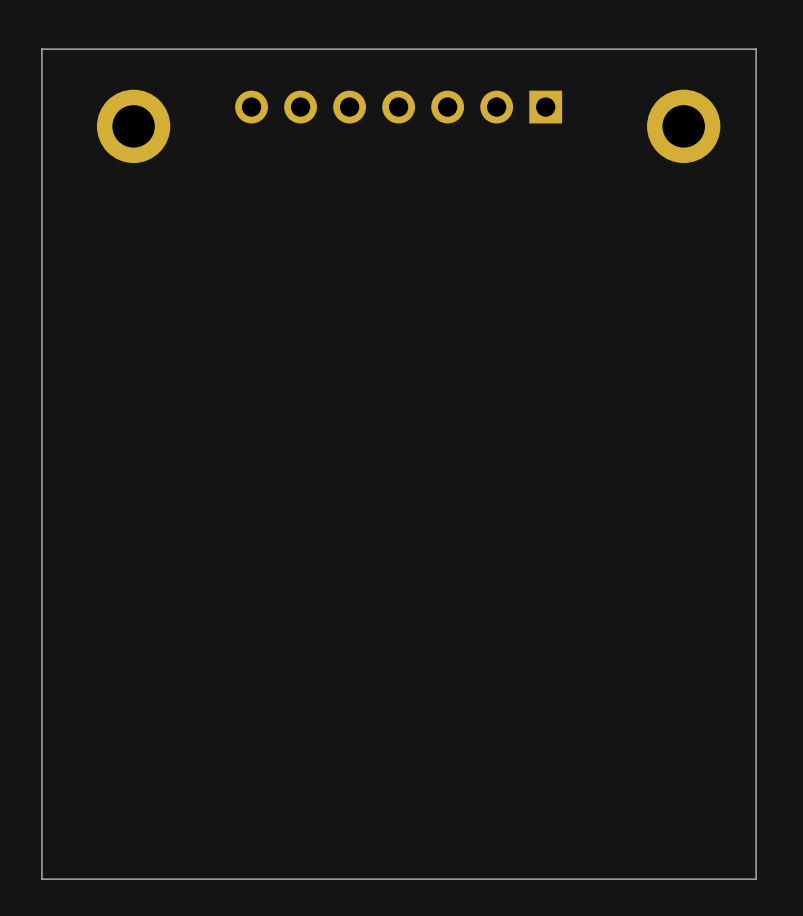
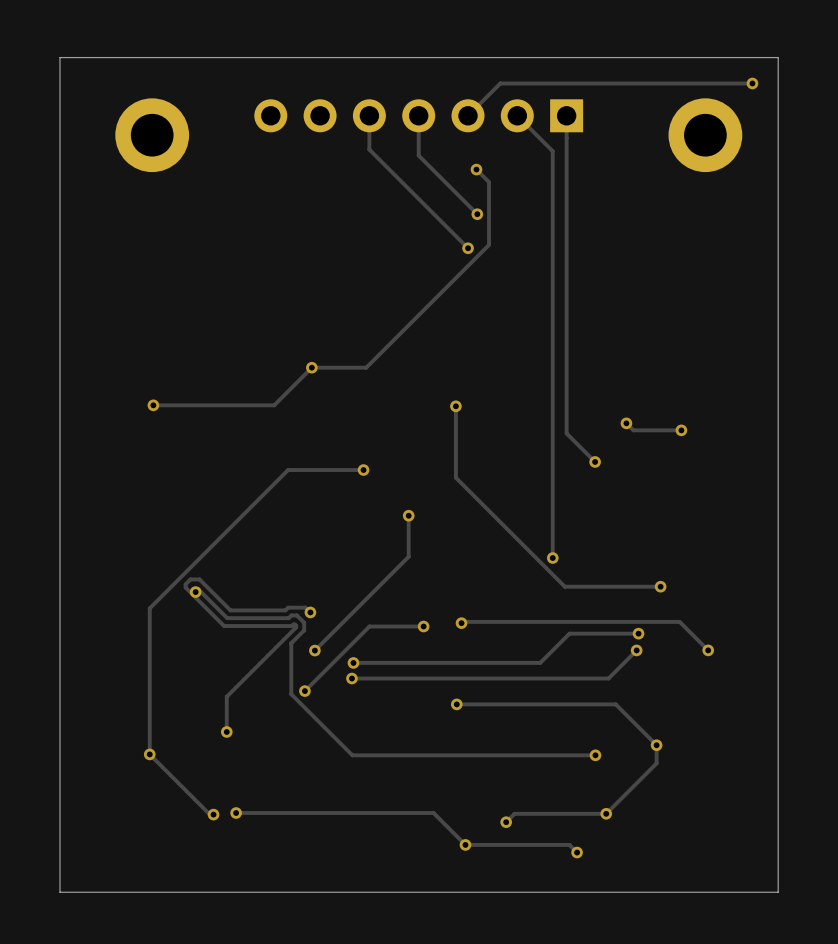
track: none -> (752, 83) (500, 83) (468, 115)
via: none -> (752, 83)
track: none -> (369, 115) (369, 149) (468, 248)
track: none -> (418, 115) (418, 155) (477, 214)
track: none -> (517, 115) (552, 151) (552, 558)
track: none -> (566, 115) (566, 433) (595, 461)
track: none -> (476, 169) (489, 182) (489, 244) (366, 367) (311, 367) (274, 405) (153, 405)
via: none -> (476, 169)
via: none -> (477, 214)
via: none -> (468, 248)
via: none -> (311, 367)
via: none -> (153, 405)
track: none -> (455, 406) (455, 477) (564, 586) (660, 586)
via: none -> (455, 406)
track: none -> (626, 423) (633, 430) (681, 430)
via: none -> (626, 423)
via: none -> (681, 430)
via: none -> (595, 461)
track: none -> (363, 470) (288, 470) (149, 608) (149, 754) (209, 814) (213, 814)
via: none -> (363, 470)
track: none -> (408, 515) (408, 556) (314, 650)
via: none -> (408, 515)
via: none -> (552, 558)
via: none -> (660, 586)
track: none -> (195, 592) (198, 589) (227, 618) (288, 618) (291, 615) (296, 615) (304, 622) (304, 630) (291, 643) (291, 694) (352, 755) (595, 755)
via: none -> (195, 592)
track: none -> (310, 612) (305, 607) (288, 607) (285, 610) (230, 610) (199, 579) (190, 579) (185, 584) (185, 587) (224, 626) (296, 625) (226, 696) (226, 731)
via: none -> (310, 612)
track: none -> (461, 623) (679, 621) (708, 650)
via: none -> (461, 623)
track: none -> (423, 626) (369, 626) (304, 691)
via: none -> (423, 626)
track: none -> (638, 633) (569, 633) (540, 662) (353, 662)
via: none -> (638, 633)
via: none -> (314, 650)
track: none -> (636, 650) (608, 678) (351, 678)
via: none -> (636, 650)
via: none -> (708, 650)
via: none -> (353, 662)
via: none -> (351, 678)
via: none -> (304, 691)
track: none -> (456, 704) (615, 704) (656, 745) (656, 763) (606, 813) (514, 813) (506, 822)
via: none -> (456, 704)
via: none -> (226, 731)
via: none -> (656, 745)
via: none -> (149, 754)
via: none -> (595, 755)
track: none -> (236, 813) (433, 813) (465, 844) (569, 844) (577, 852)
via: none -> (236, 813)
via: none -> (213, 814)
via: none -> (606, 813)
via: none -> (506, 822)
via: none -> (465, 844)
via: none -> (577, 852)

